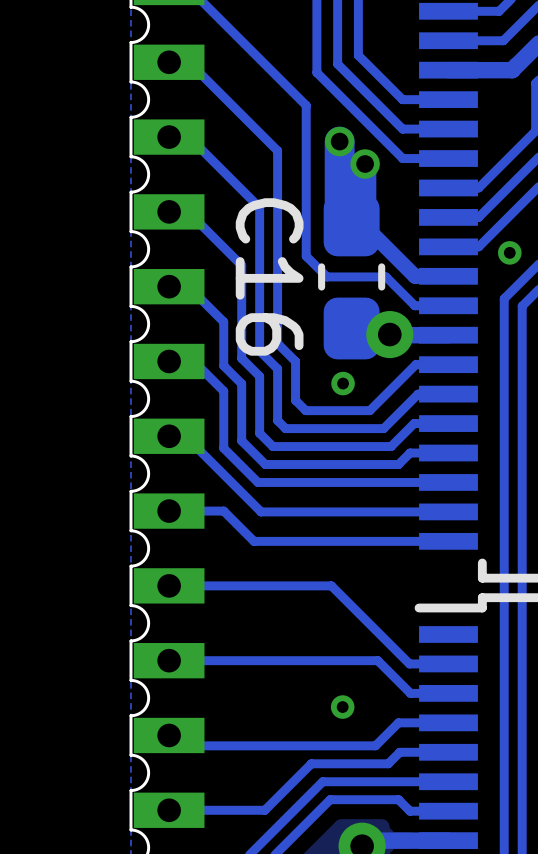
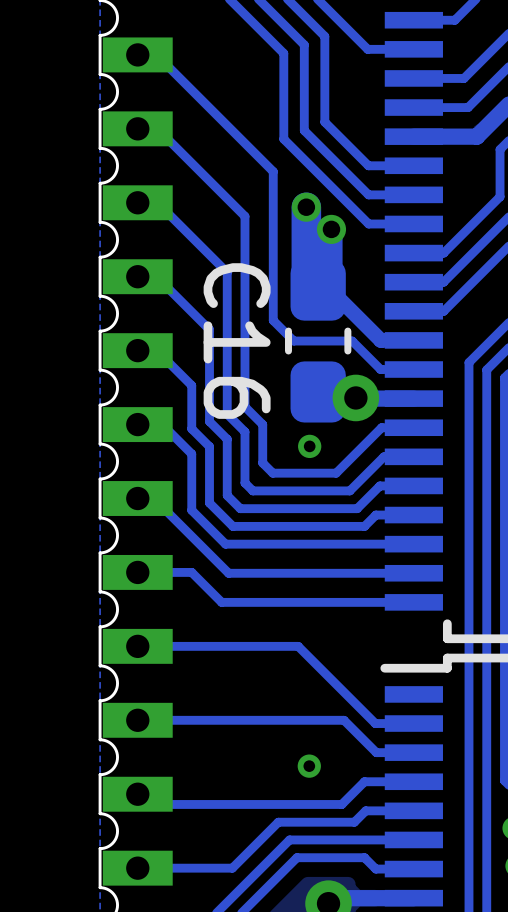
via: (509, 252) -> none

